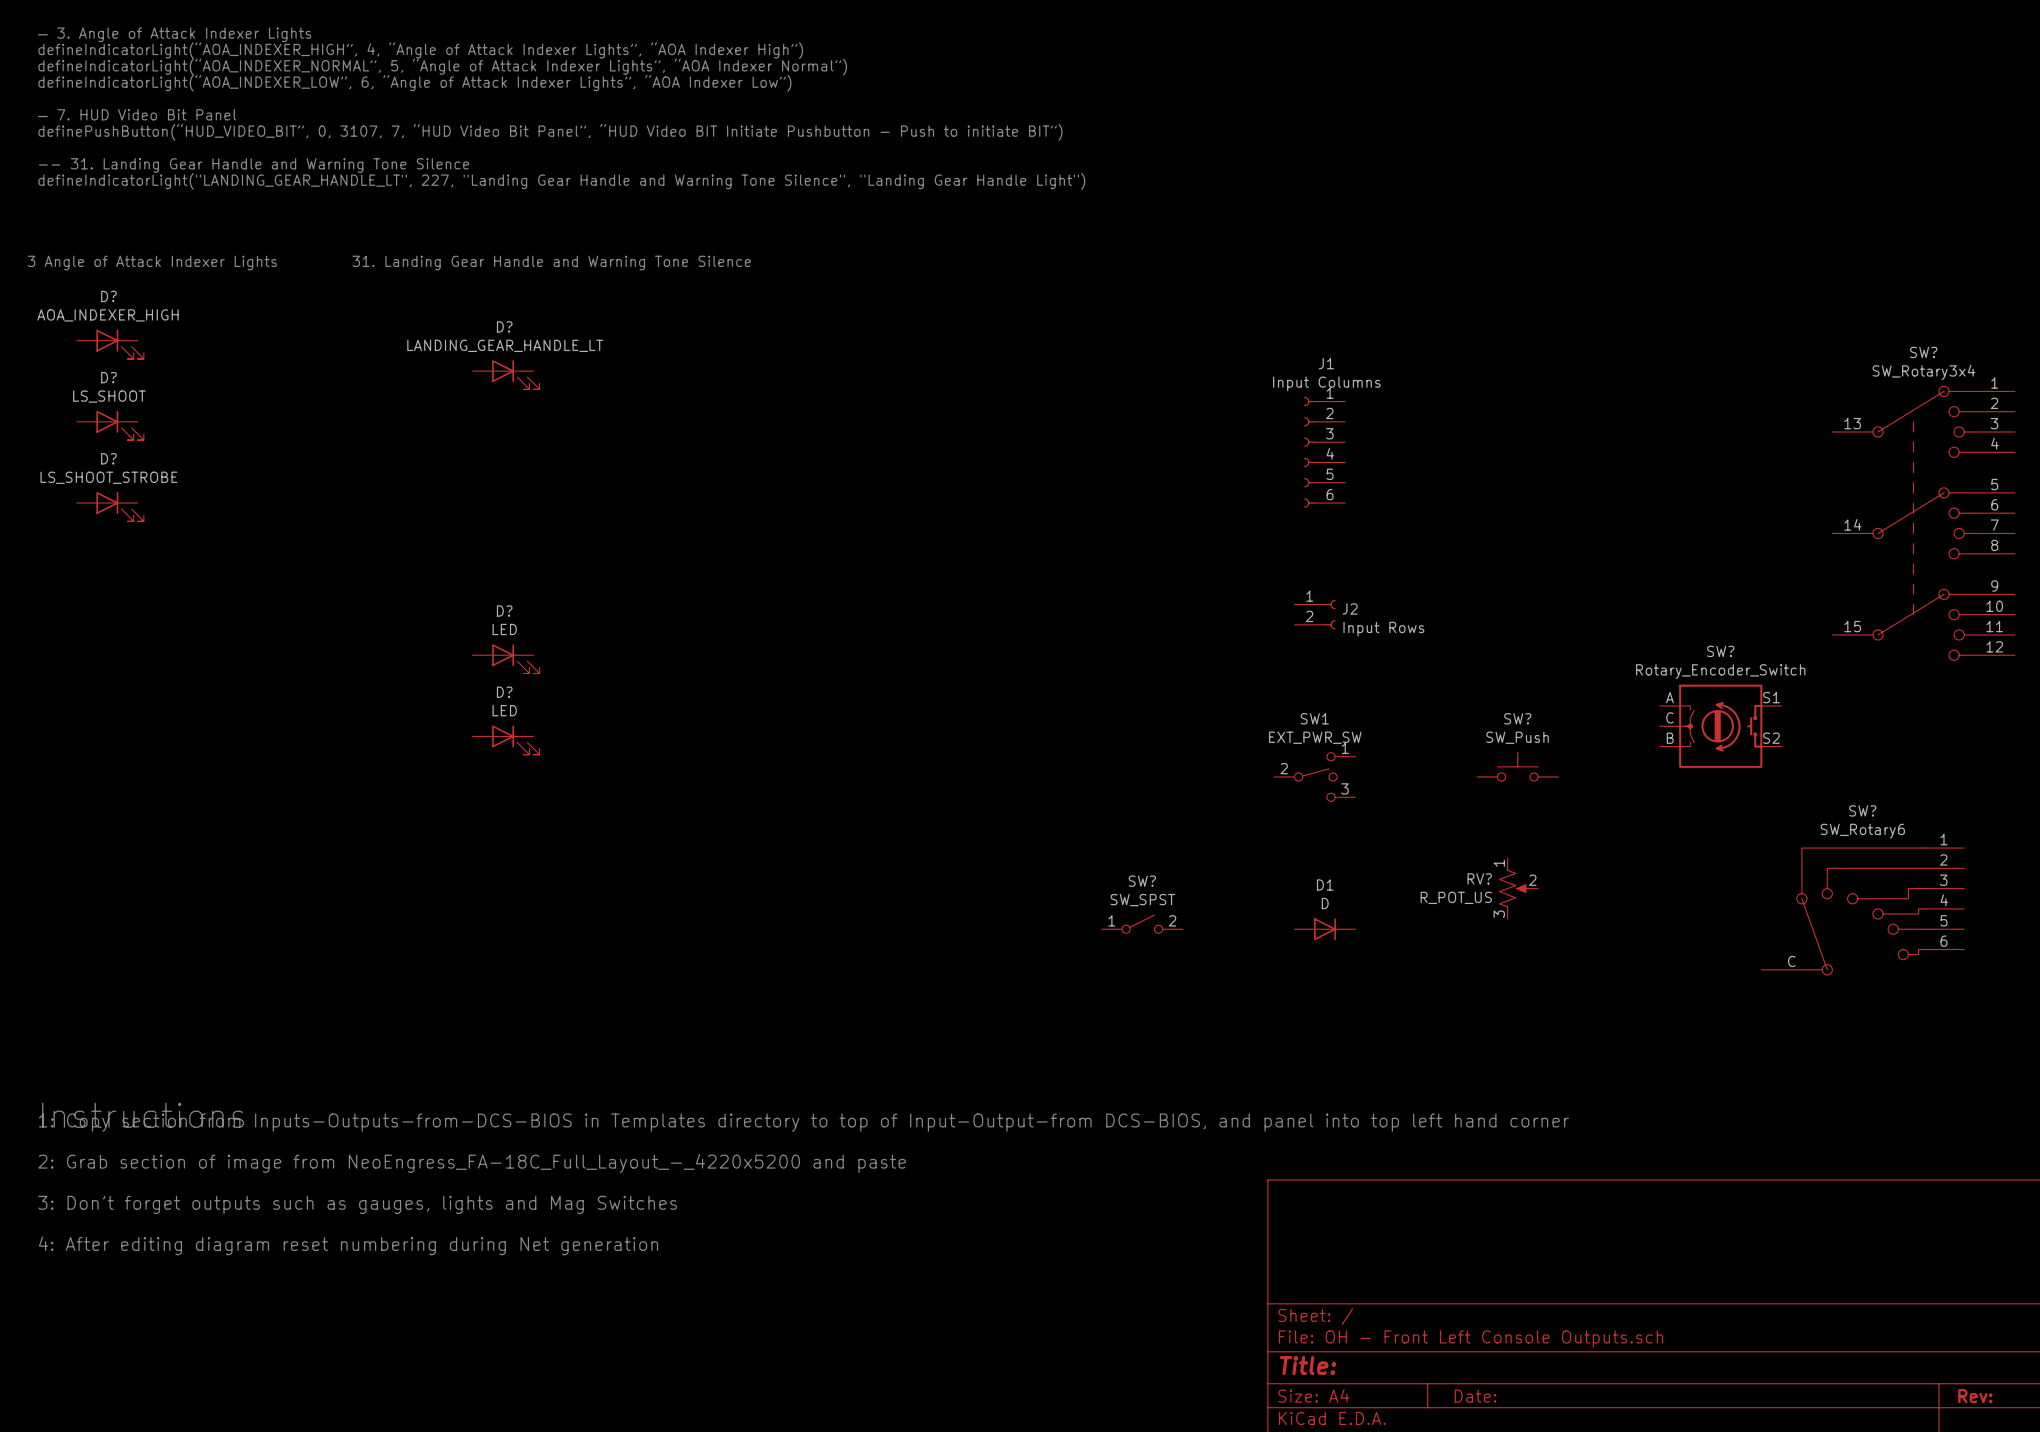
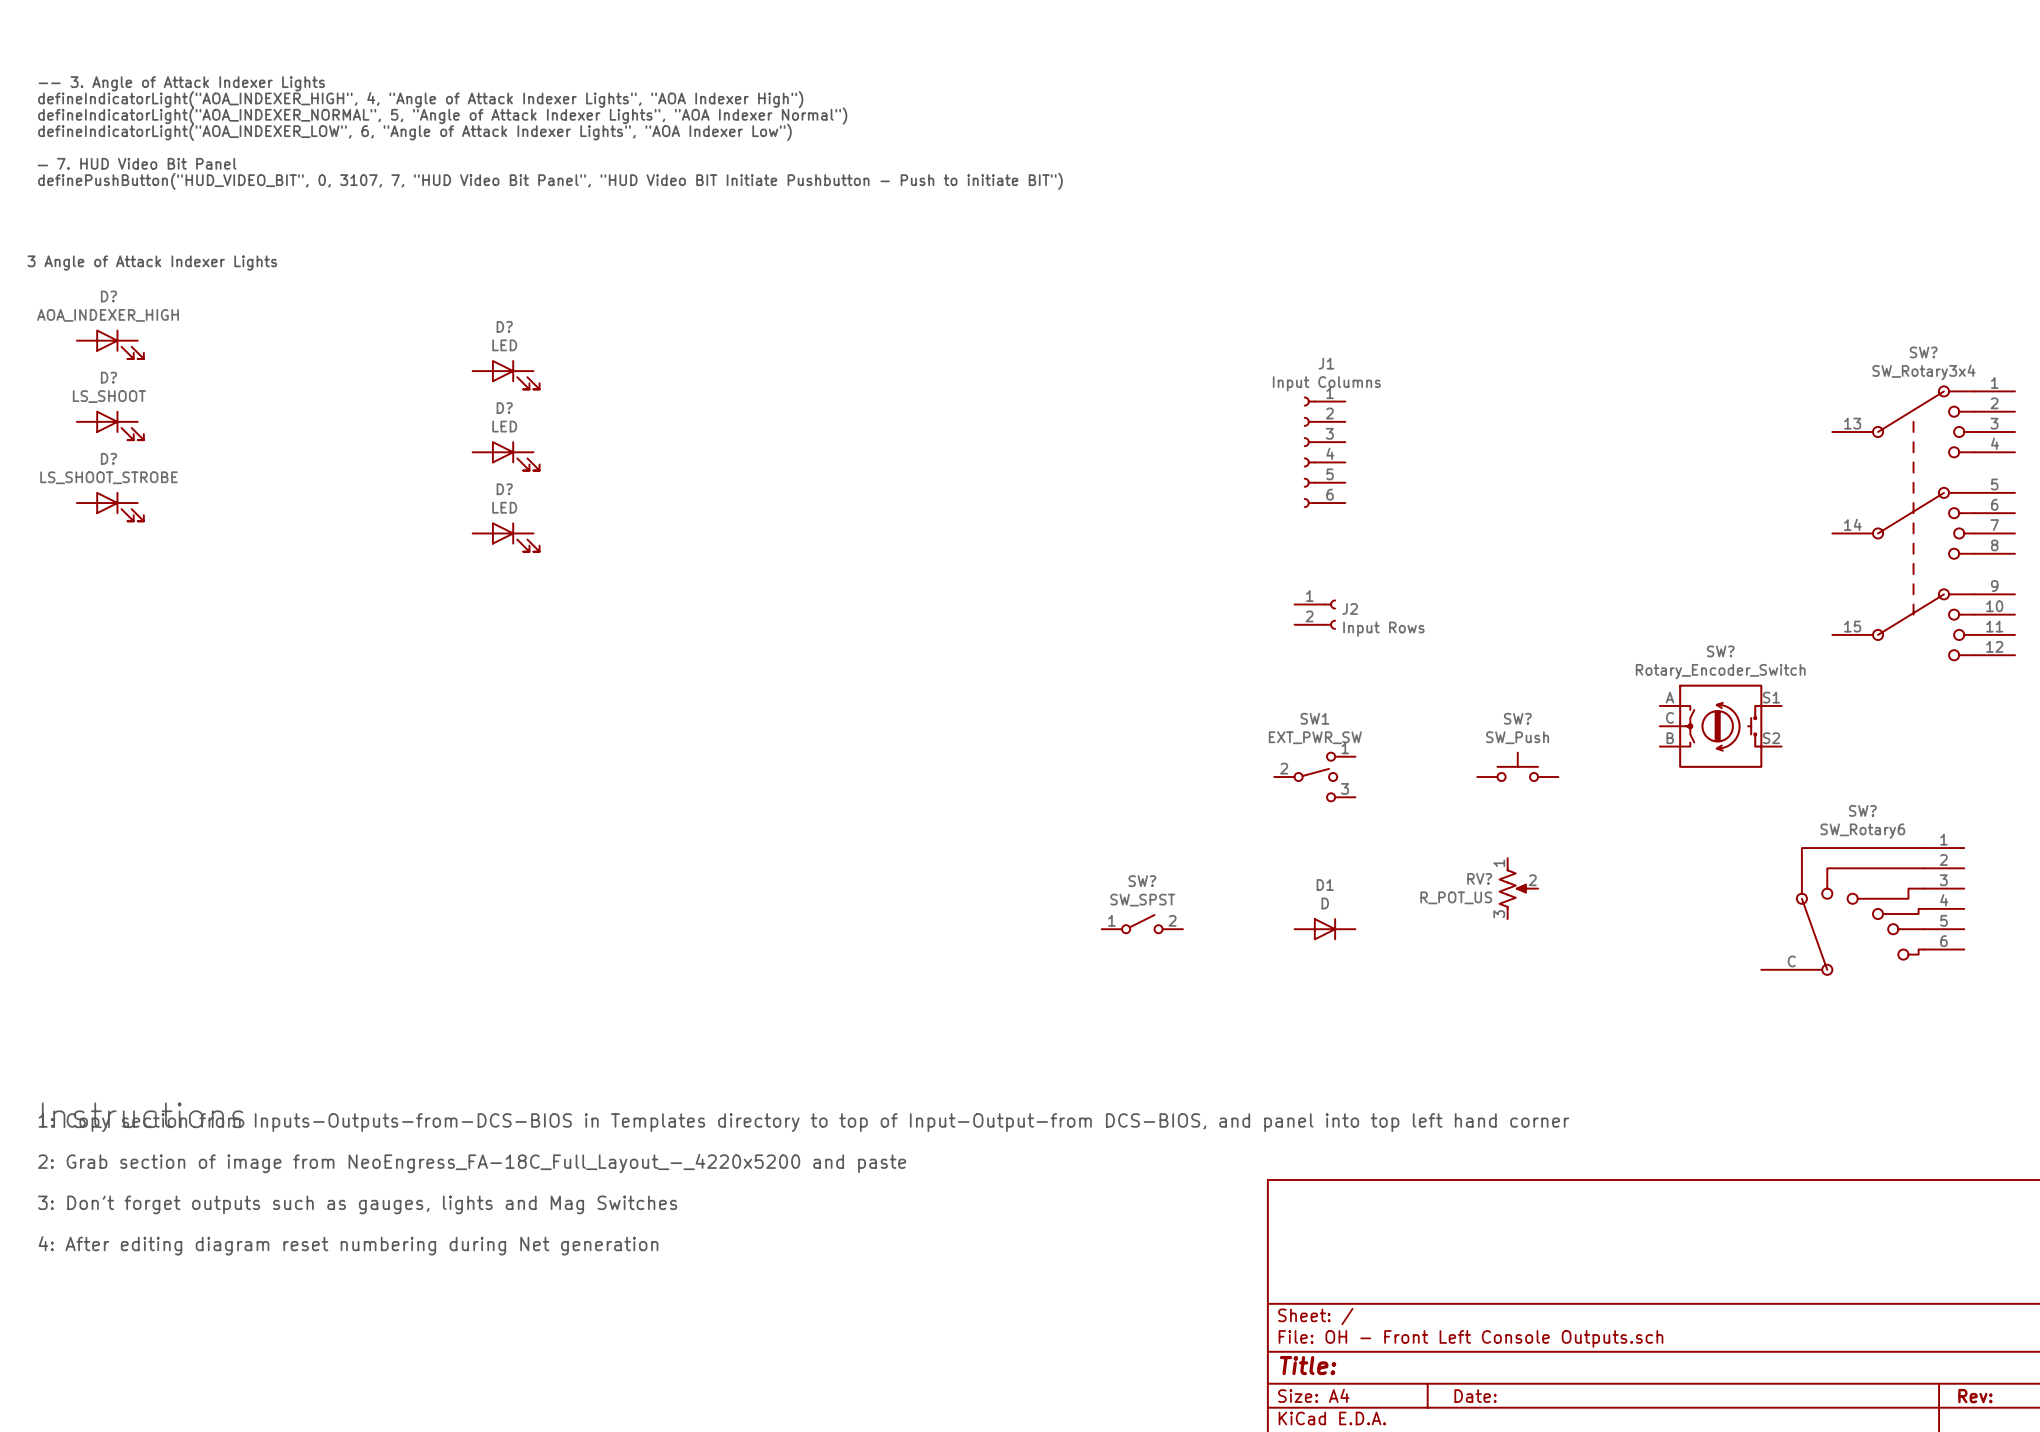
text: — 3. Angle of Attack Indexer Lights (174, 34) -> none
text: defineIndicatorLight(“AOA_INDEXER_HIGH”, 4, “Angle of Attack Indexer Lights”, “AOA Indexer High”) (420, 50) -> none
text: defineIndicatorLight(“AOA_INDEXER_NORMAL”, 5, “Angle of Attack Indexer Lights”, “AOA Indexer Normal”) (442, 66) -> none
text: defineIndicatorLight(“AOA_INDEXER_LOW”, 6, “Angle of Attack Indexer Lights”, “AOA Indexer Low”) (414, 83) -> -- 3. Angle of Attack Indexer Lights (181, 83)
text: none -> defineIndicatorLight("AOA_INDEXER_HIGH", 4, "Angle of Attack Indexer Lights", "AOA Indexer High") (420, 99)
text: — 7. HUD Video Bit Panel (137, 114) -> defineIndicatorLight("AOA_INDEXER_NORMAL", 5, "Angle of Attack Indexer Lights", "AOA Indexer Normal") (442, 116)
text: definePushButton(“HUD_VIDEO_BIT”, 0, 3107, 7, “HUD Video Bit Panel”, “HUD Video BIT Initiate Pushbutton - Push to initiate BIT”) (550, 132) -> defineIndicatorLight("AOA_INDEXER_LOW", 6, "Angle of Attack Indexer Lights", "AOA Indexer Low") (414, 132)
text: -- 31. Landing Gear Handle and Warning Tone Silence (254, 165) -> — 7. HUD Video Bit Panel (137, 163)
text: defineIndicatorLight("LANDING_GEAR_HANDLE_LT", 227, "Landing Gear Handle and Warning Tone Silence", "Landing Gear Handle Light") (561, 181) -> definePushButton("HUD_VIDEO_BIT", 0, 3107, 7, "HUD Video Bit Panel", "HUD Video BIT Initiate Pushbutton - Push to initiate BIT") (550, 181)
text: 31. Landing Gear Handle and Warning Tone Silence (551, 263) -> none
D? value: LANDING_GEAR_HANDLE_LT (505, 345) -> LED (504, 345)
D?: none -> LED (506, 455)
D?: none -> LED (506, 537)
D?: LED (506, 658) -> none
D?: LED (506, 740) -> none

